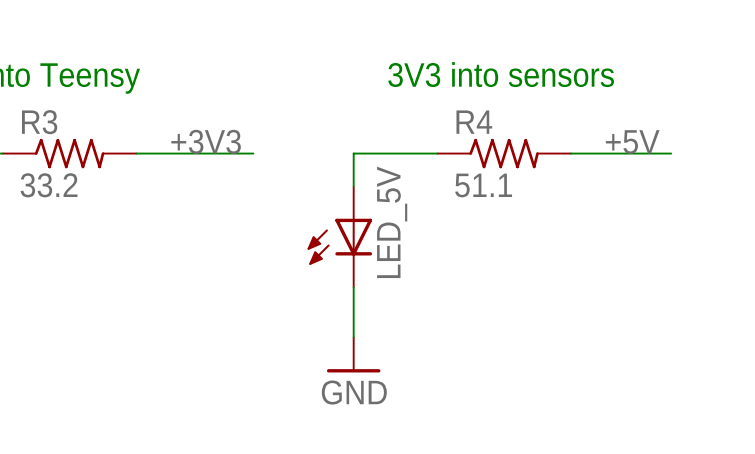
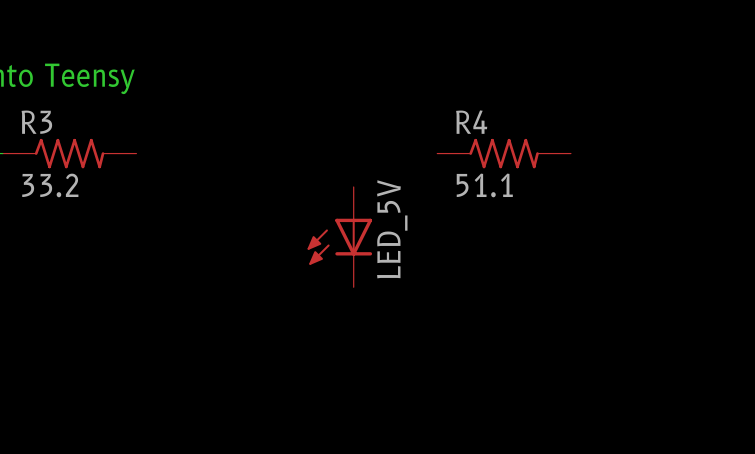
text: 3V3 into sensors (501, 74) -> none
label: +3V3 (206, 141) -> none
label: +5V (632, 142) -> none
wire: (136, 153) (253, 153) -> none
wire: (437, 153) (353, 153) (353, 186) -> none
wire: (570, 153) (671, 153) -> none
wire: (353, 287) (353, 337) -> none
power symbol: GND (353, 354) -> none

